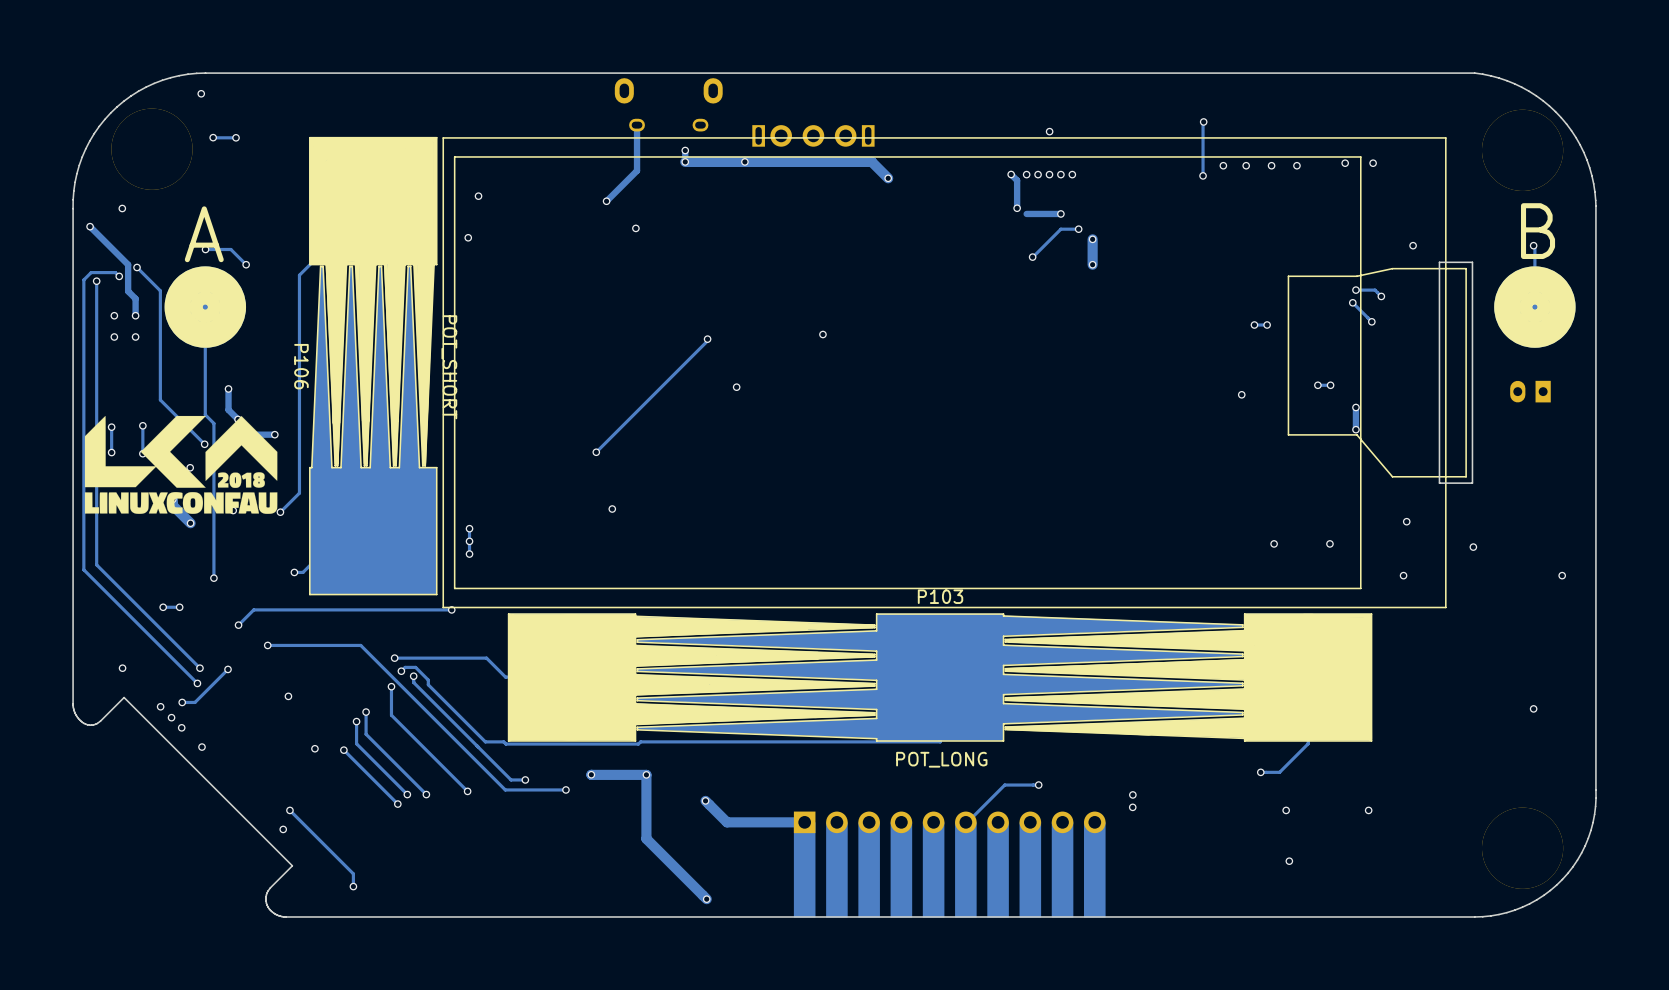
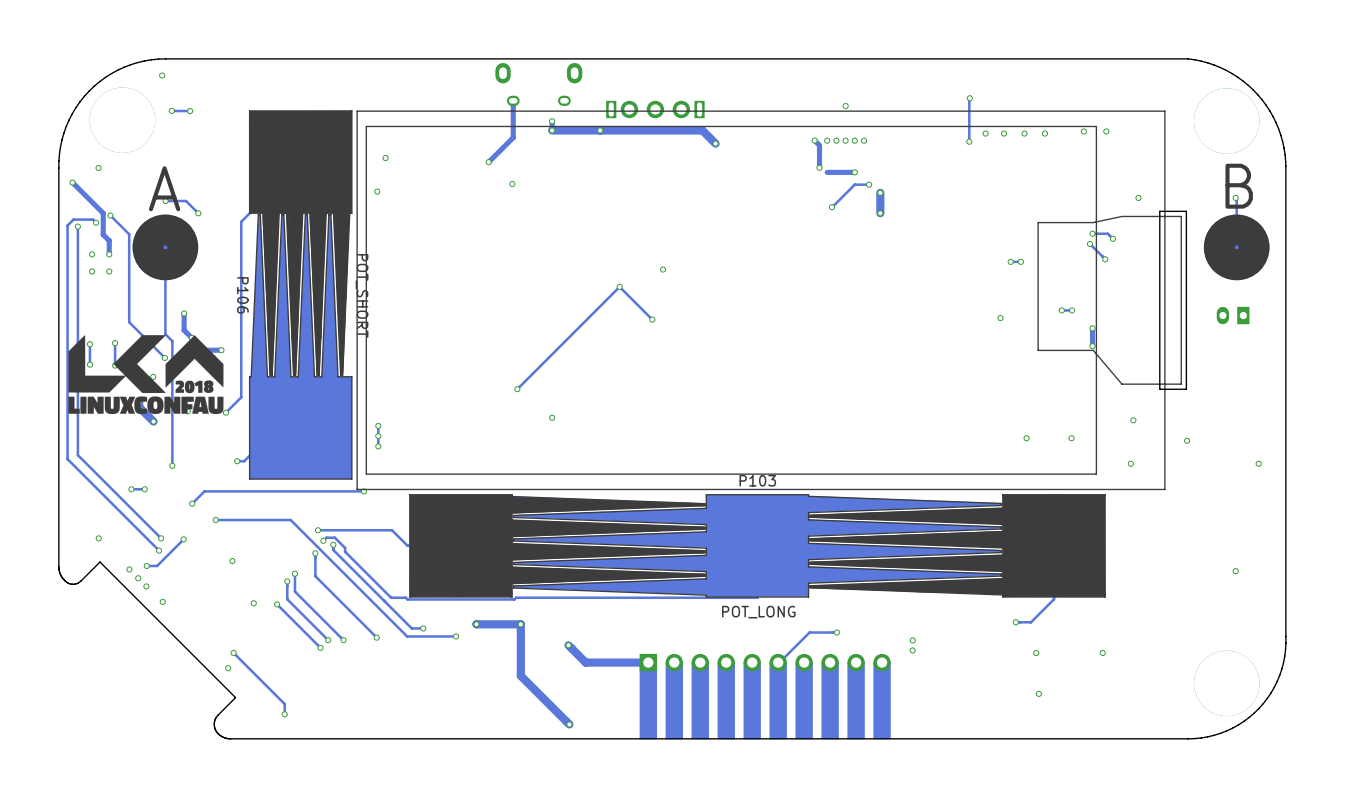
track: (707, 339) (596, 452) -> none
via: (707, 339) -> none
via: none -> (619, 286)
via: (736, 387) -> none
track: none -> (652, 319) (619, 286) (517, 389)
via: none -> (652, 319)
via: (596, 452) -> none
via: none -> (517, 389)
via: (612, 509) -> none
via: none -> (552, 417)

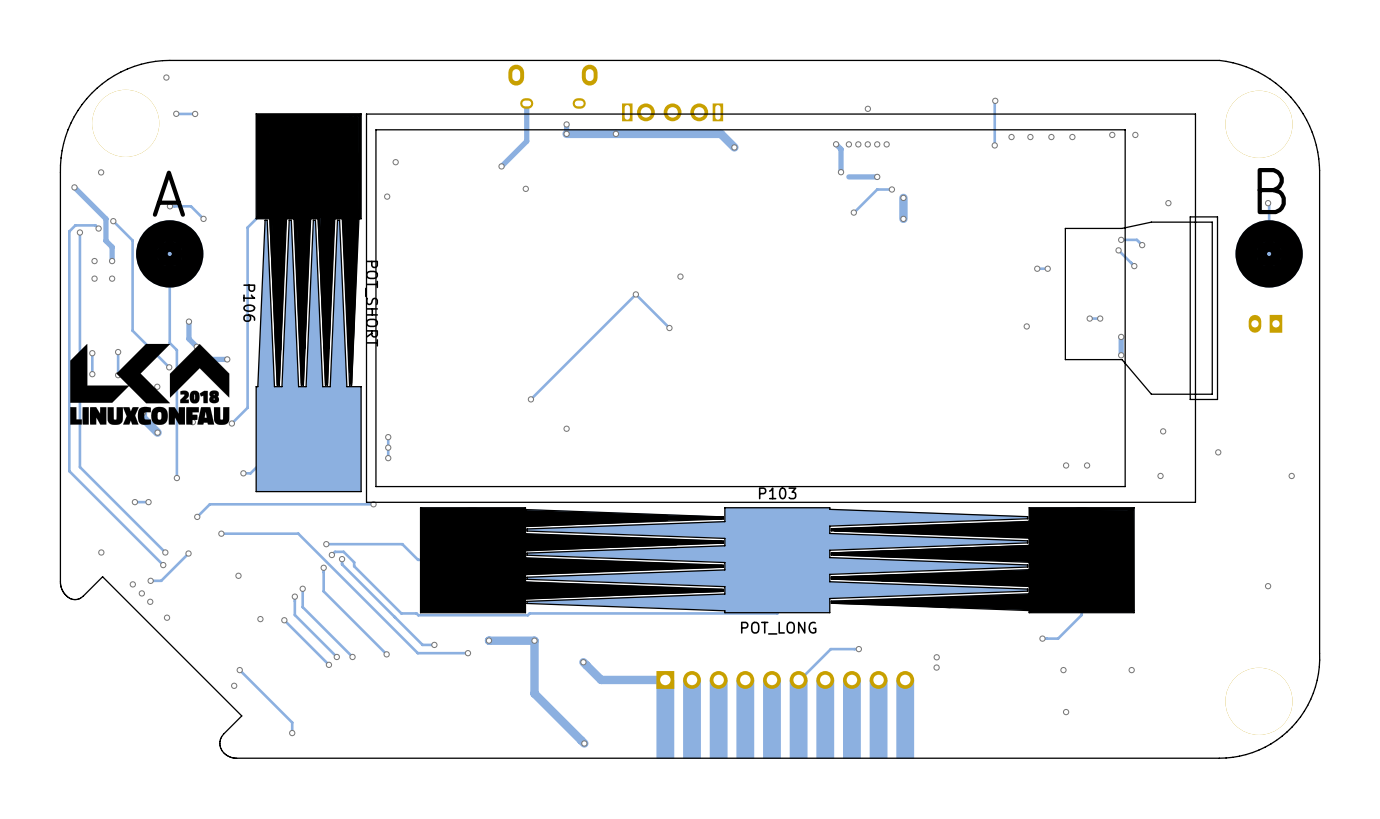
via: (1026, 438) -> none
via: (1071, 438) -> none
via: none -> (1066, 465)
via: none -> (1087, 465)

